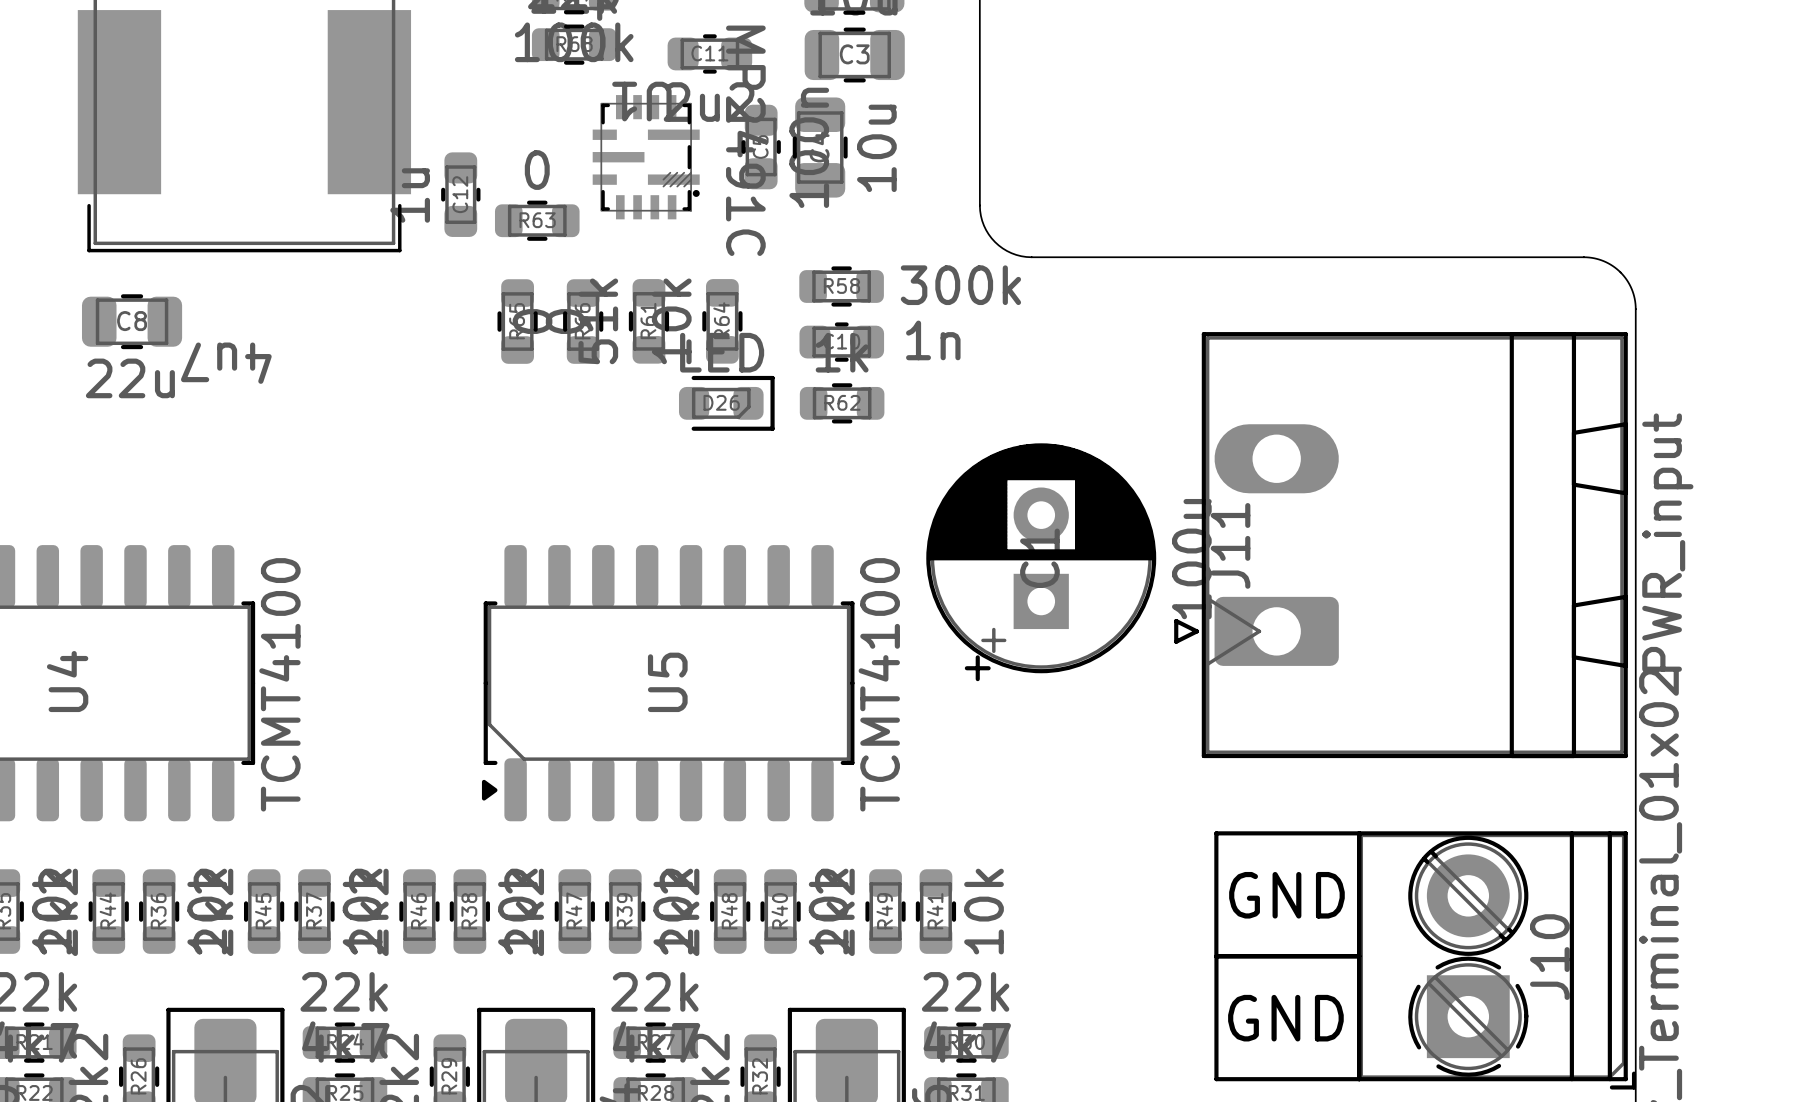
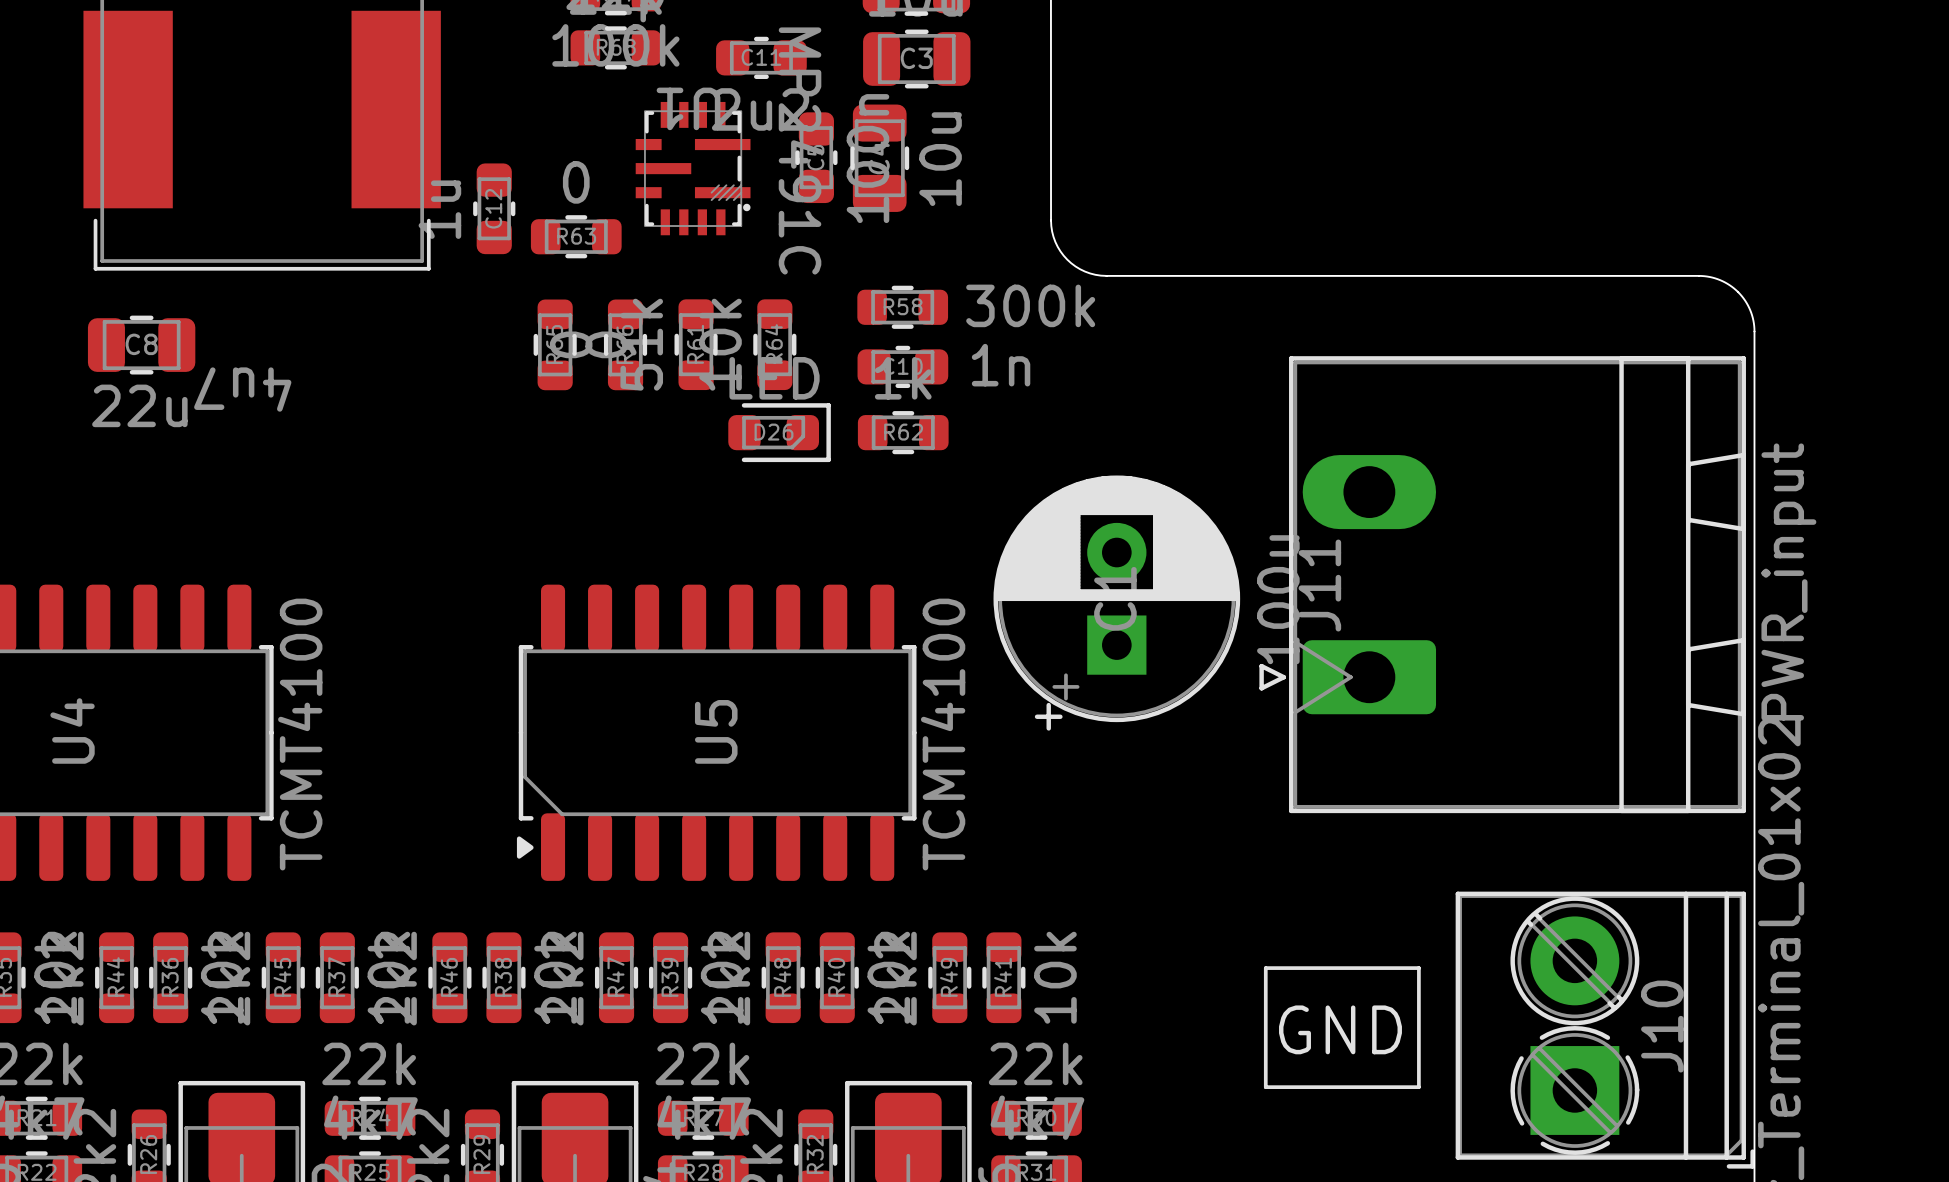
text: GND (1286, 895) -> none
line: none -> (1265, 968) (1418, 968) (1418, 1087) (1265, 1087) (1265, 968)
line: (1216, 956) (1216, 1079) (1359, 1079) (1359, 833) (1216, 833) (1216, 956) (1359, 956) -> none
text: none -> GND (1340, 1029)
text: GND (1285, 1018) -> none

